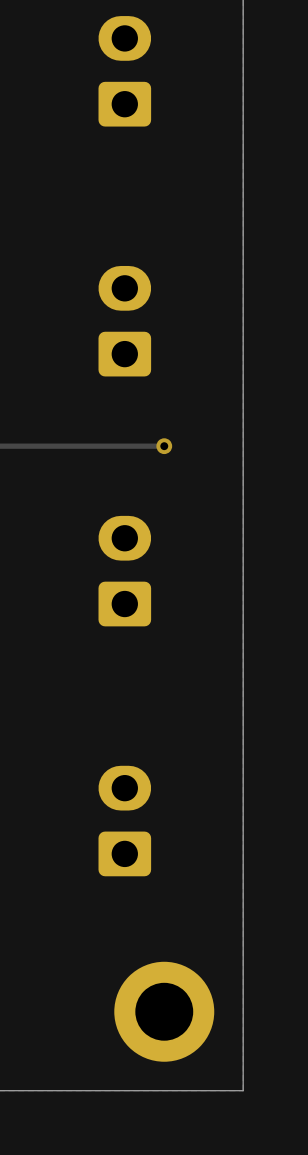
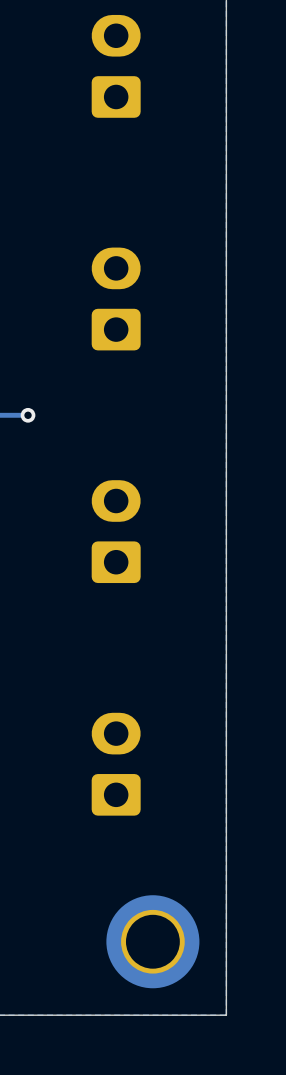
via: none -> (28, 415)
track: (164, 446) (30, 446) -> none
via: (164, 446) -> none

